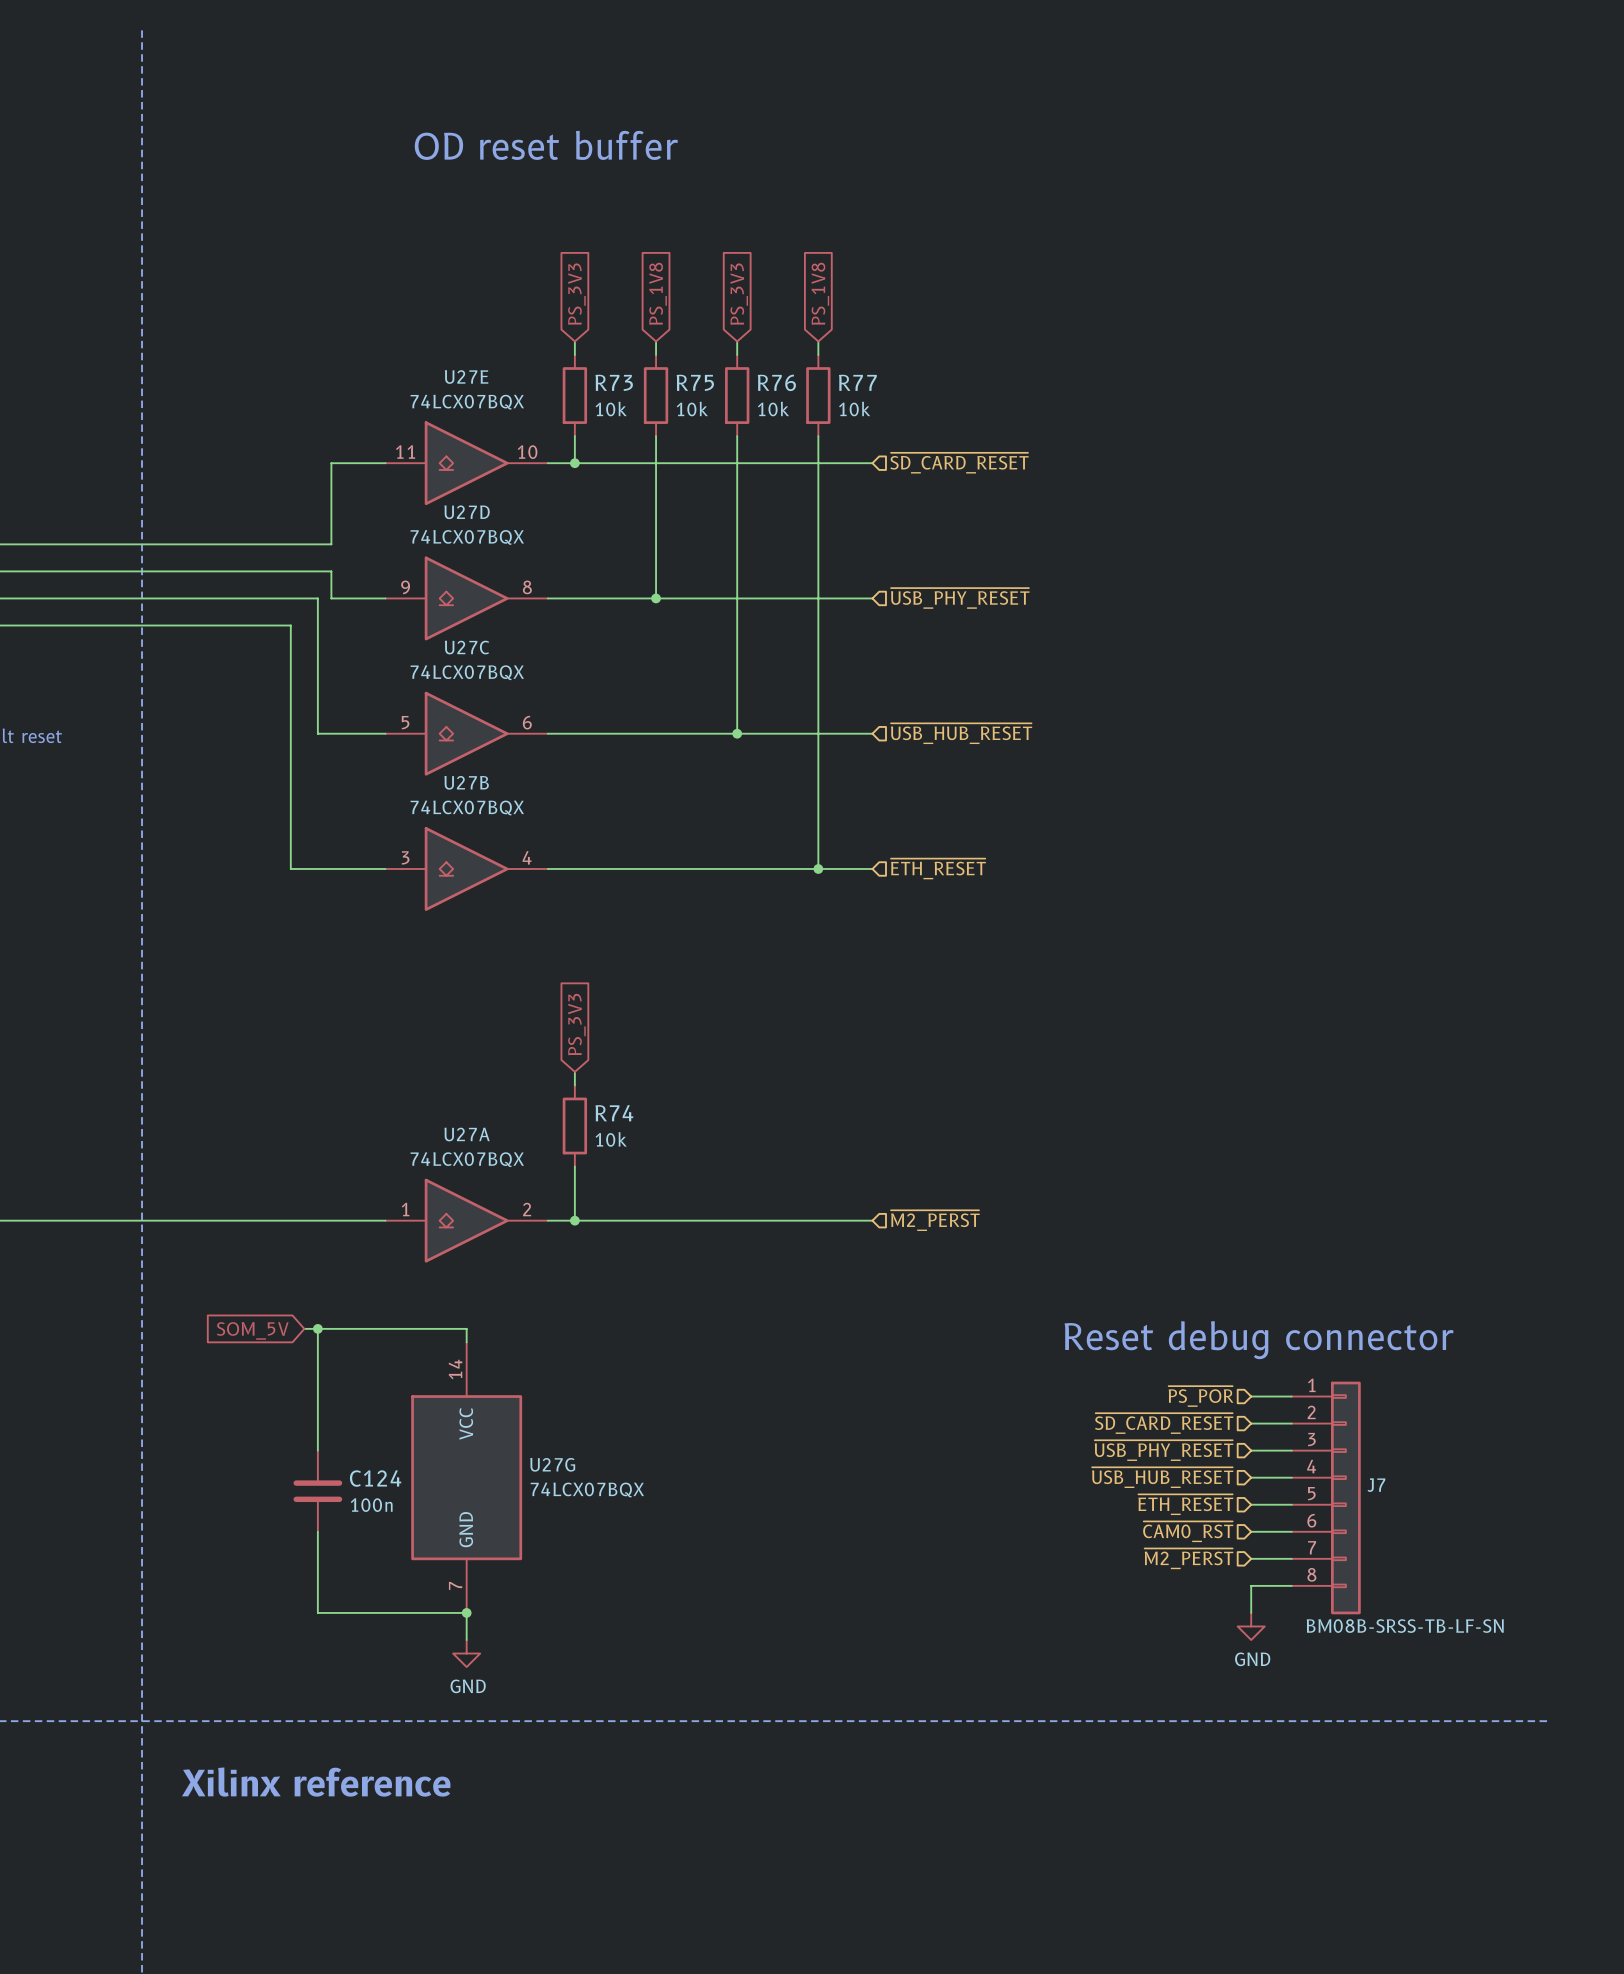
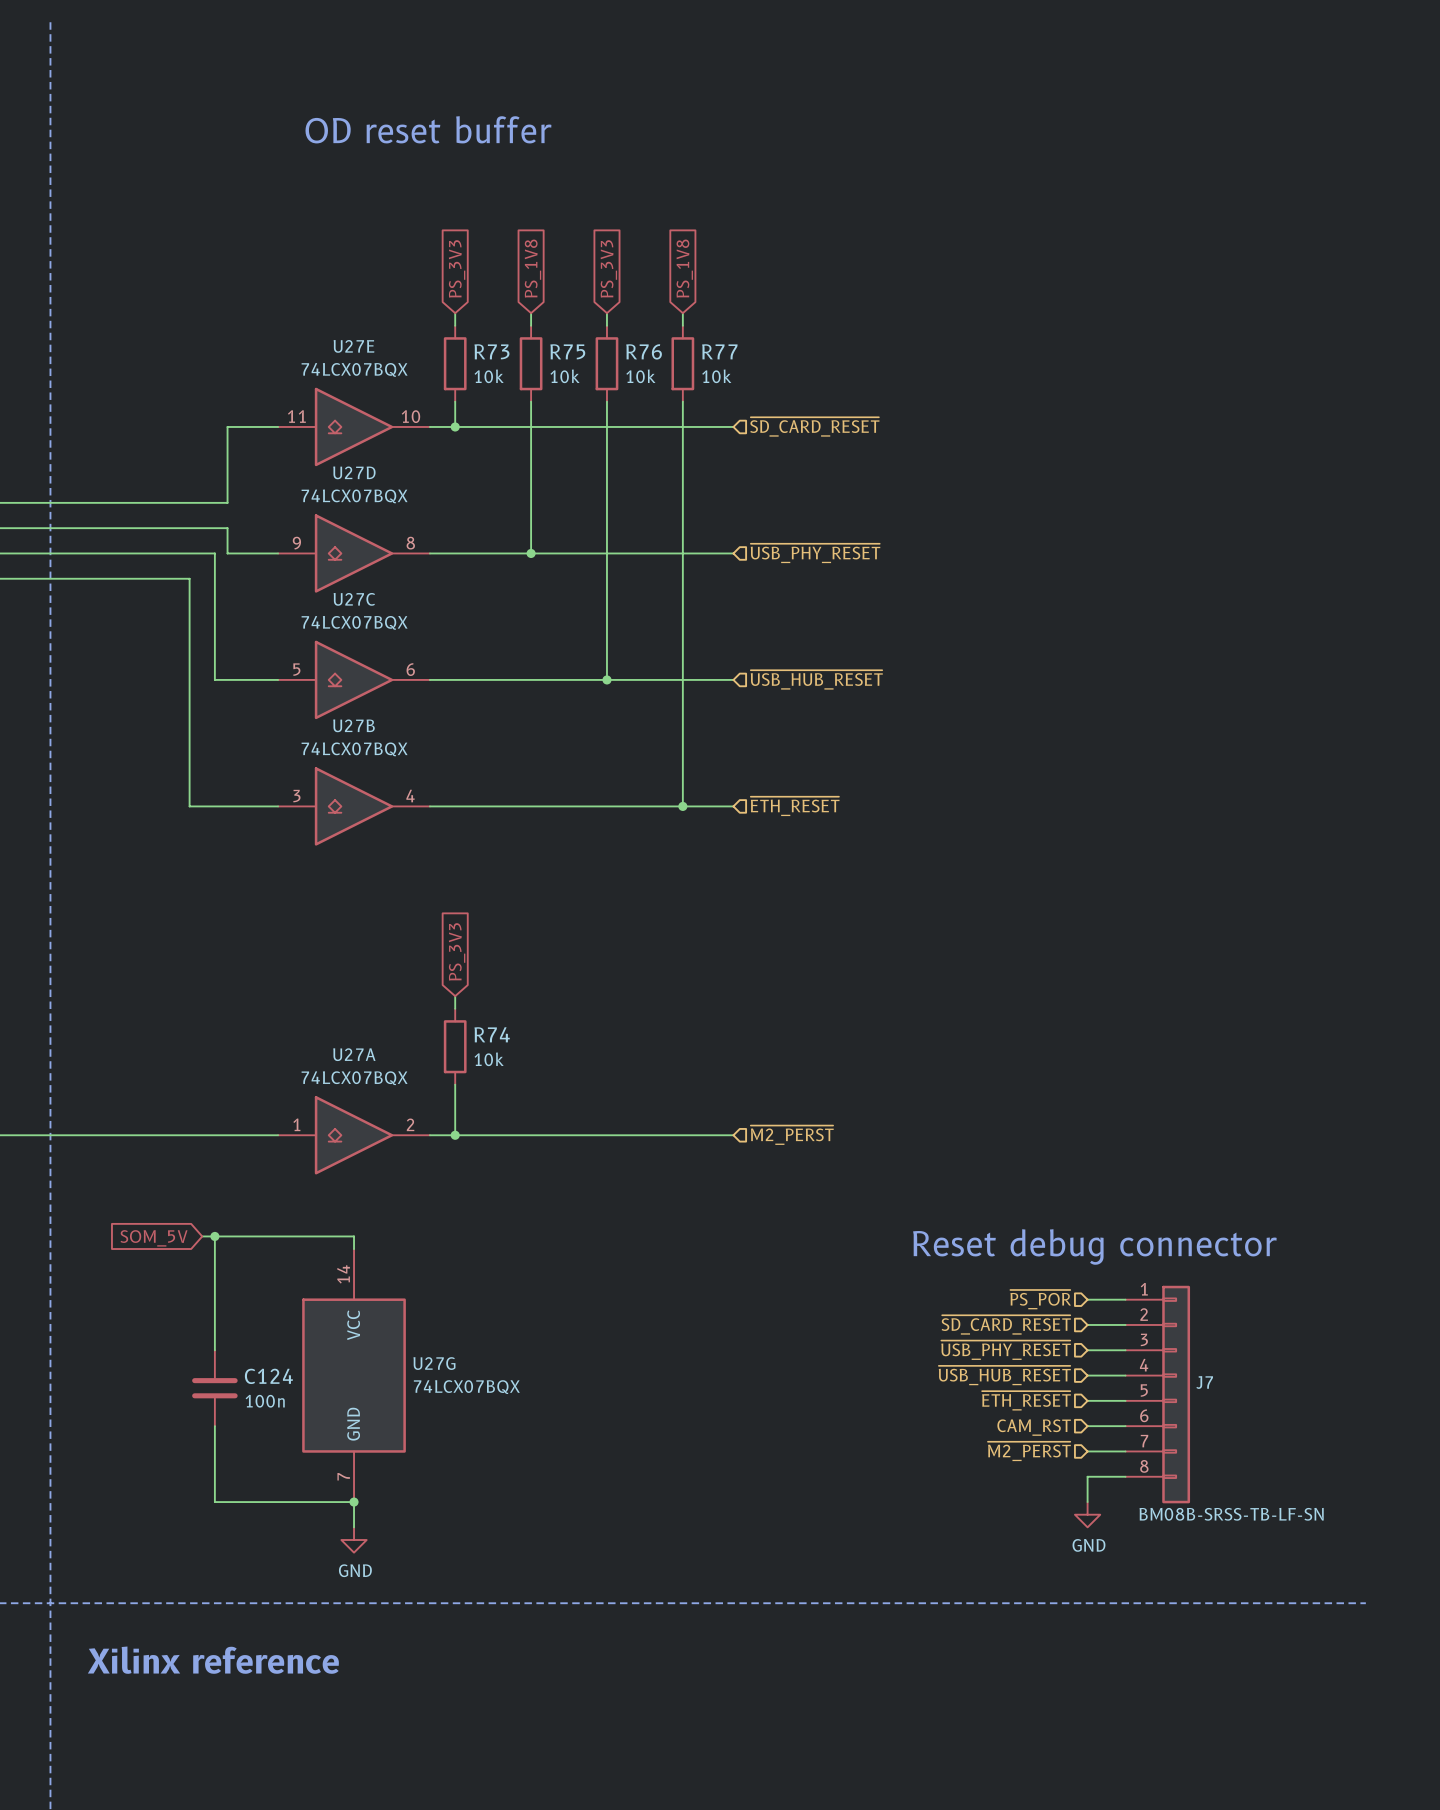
hierarchical label: ~{CAM0_RST} (1188, 1531) -> CAM_RST (1034, 1427)

